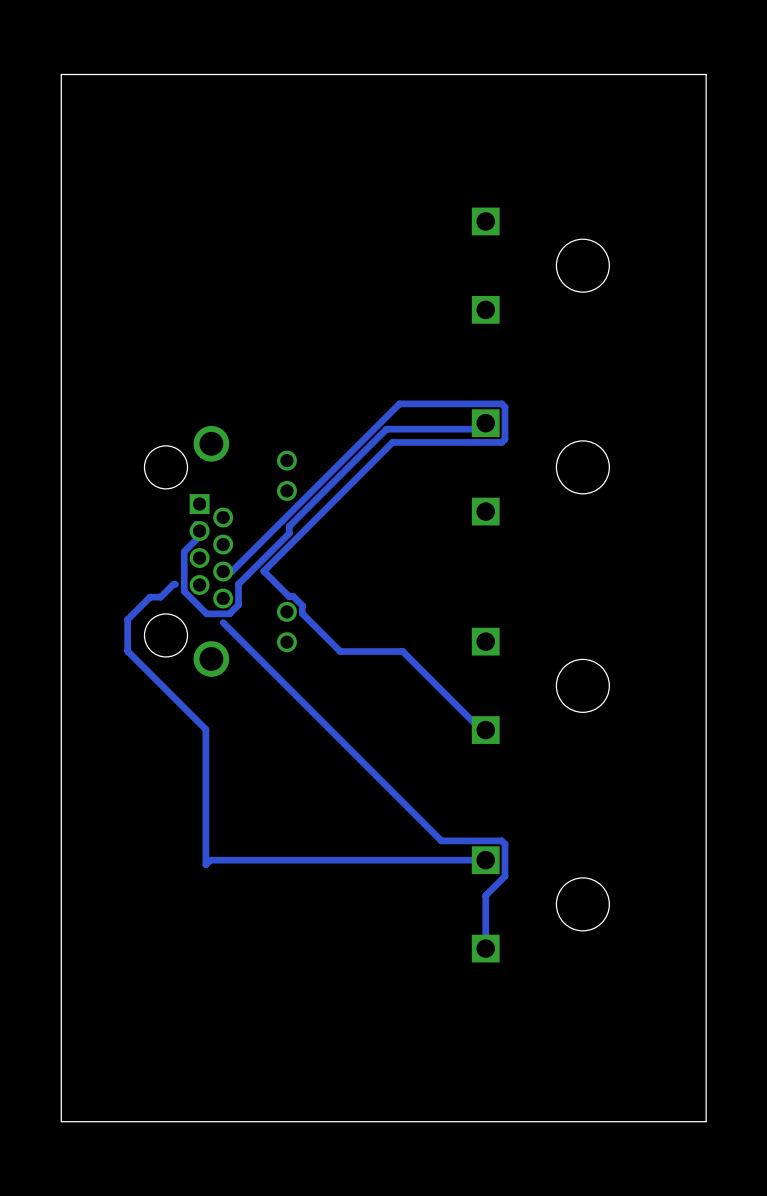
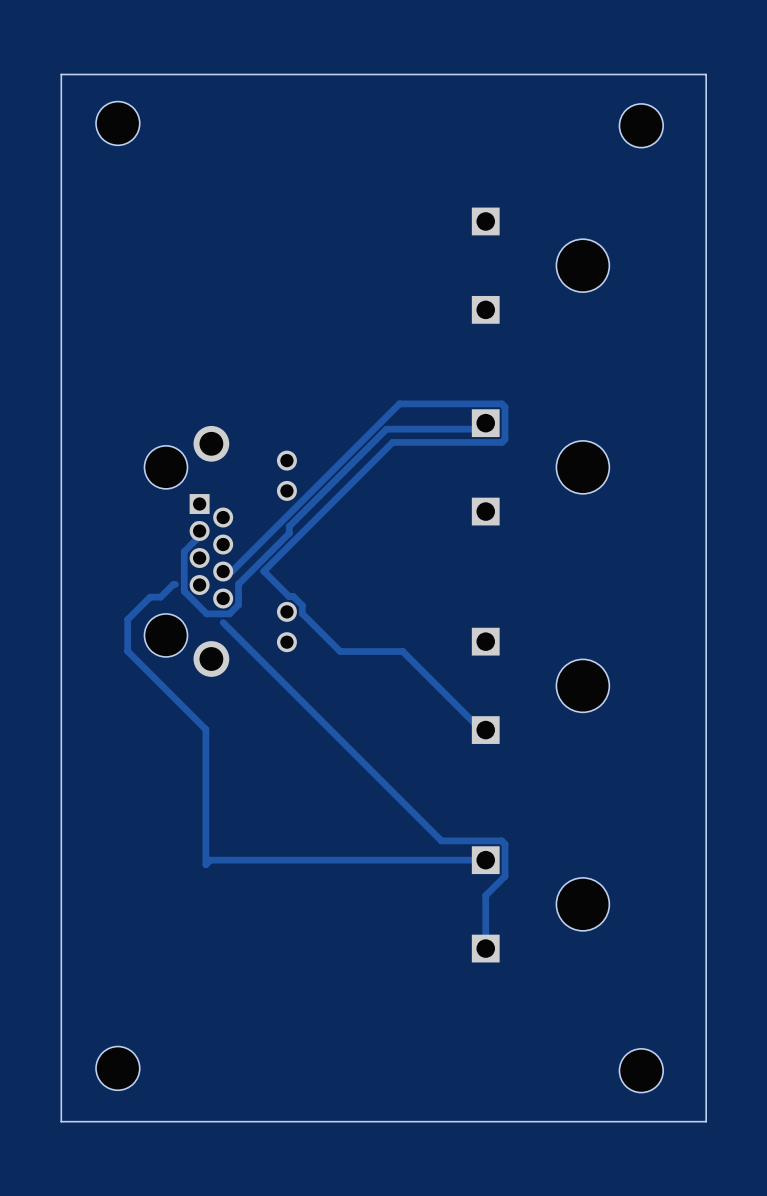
part: none -> (117, 123)
part: none -> (641, 125)
part: none -> (117, 1068)
part: none -> (641, 1070)

